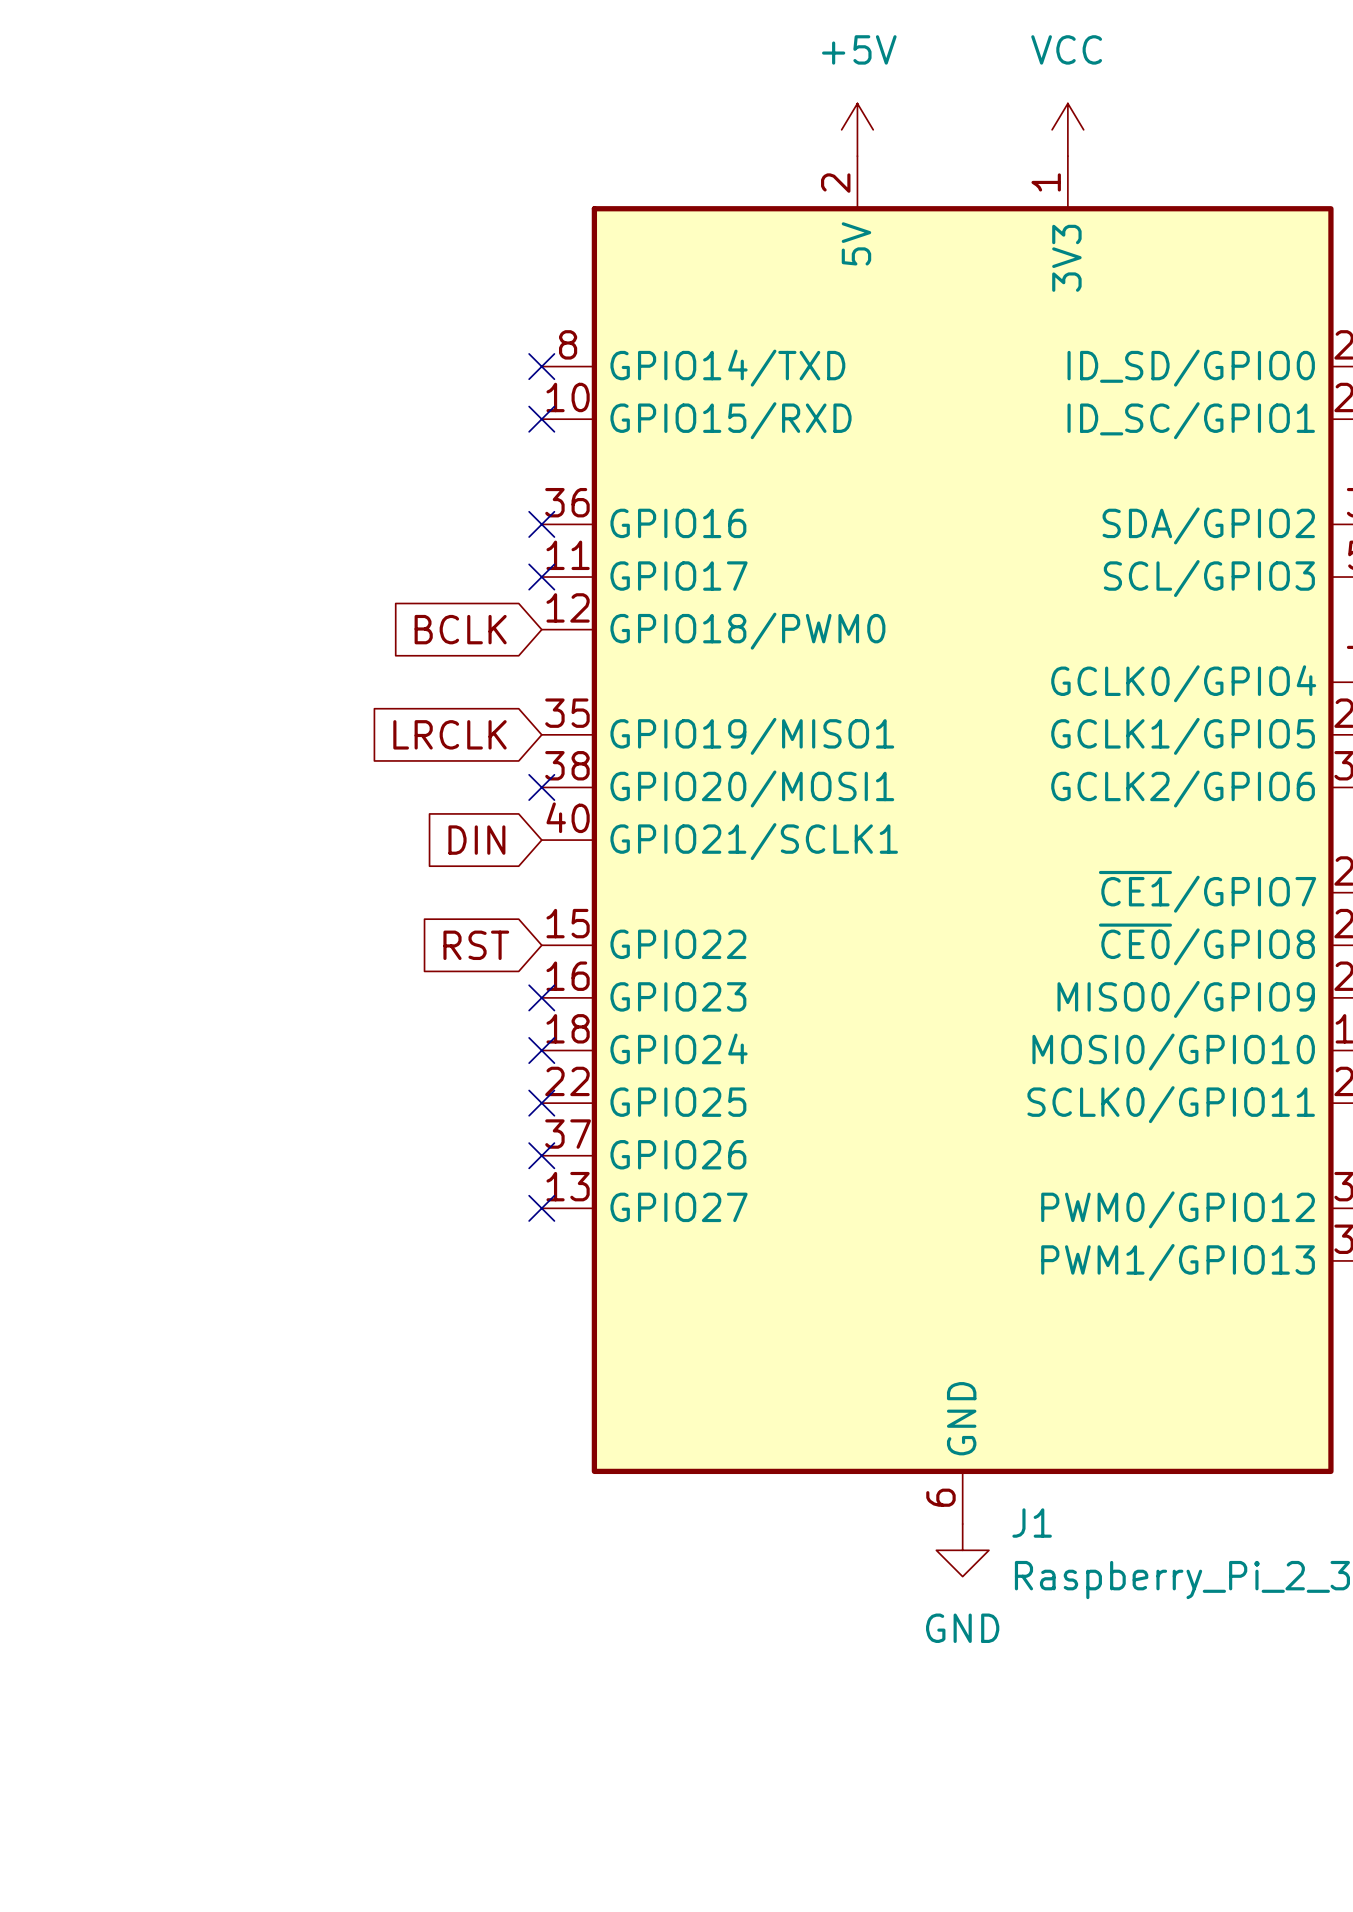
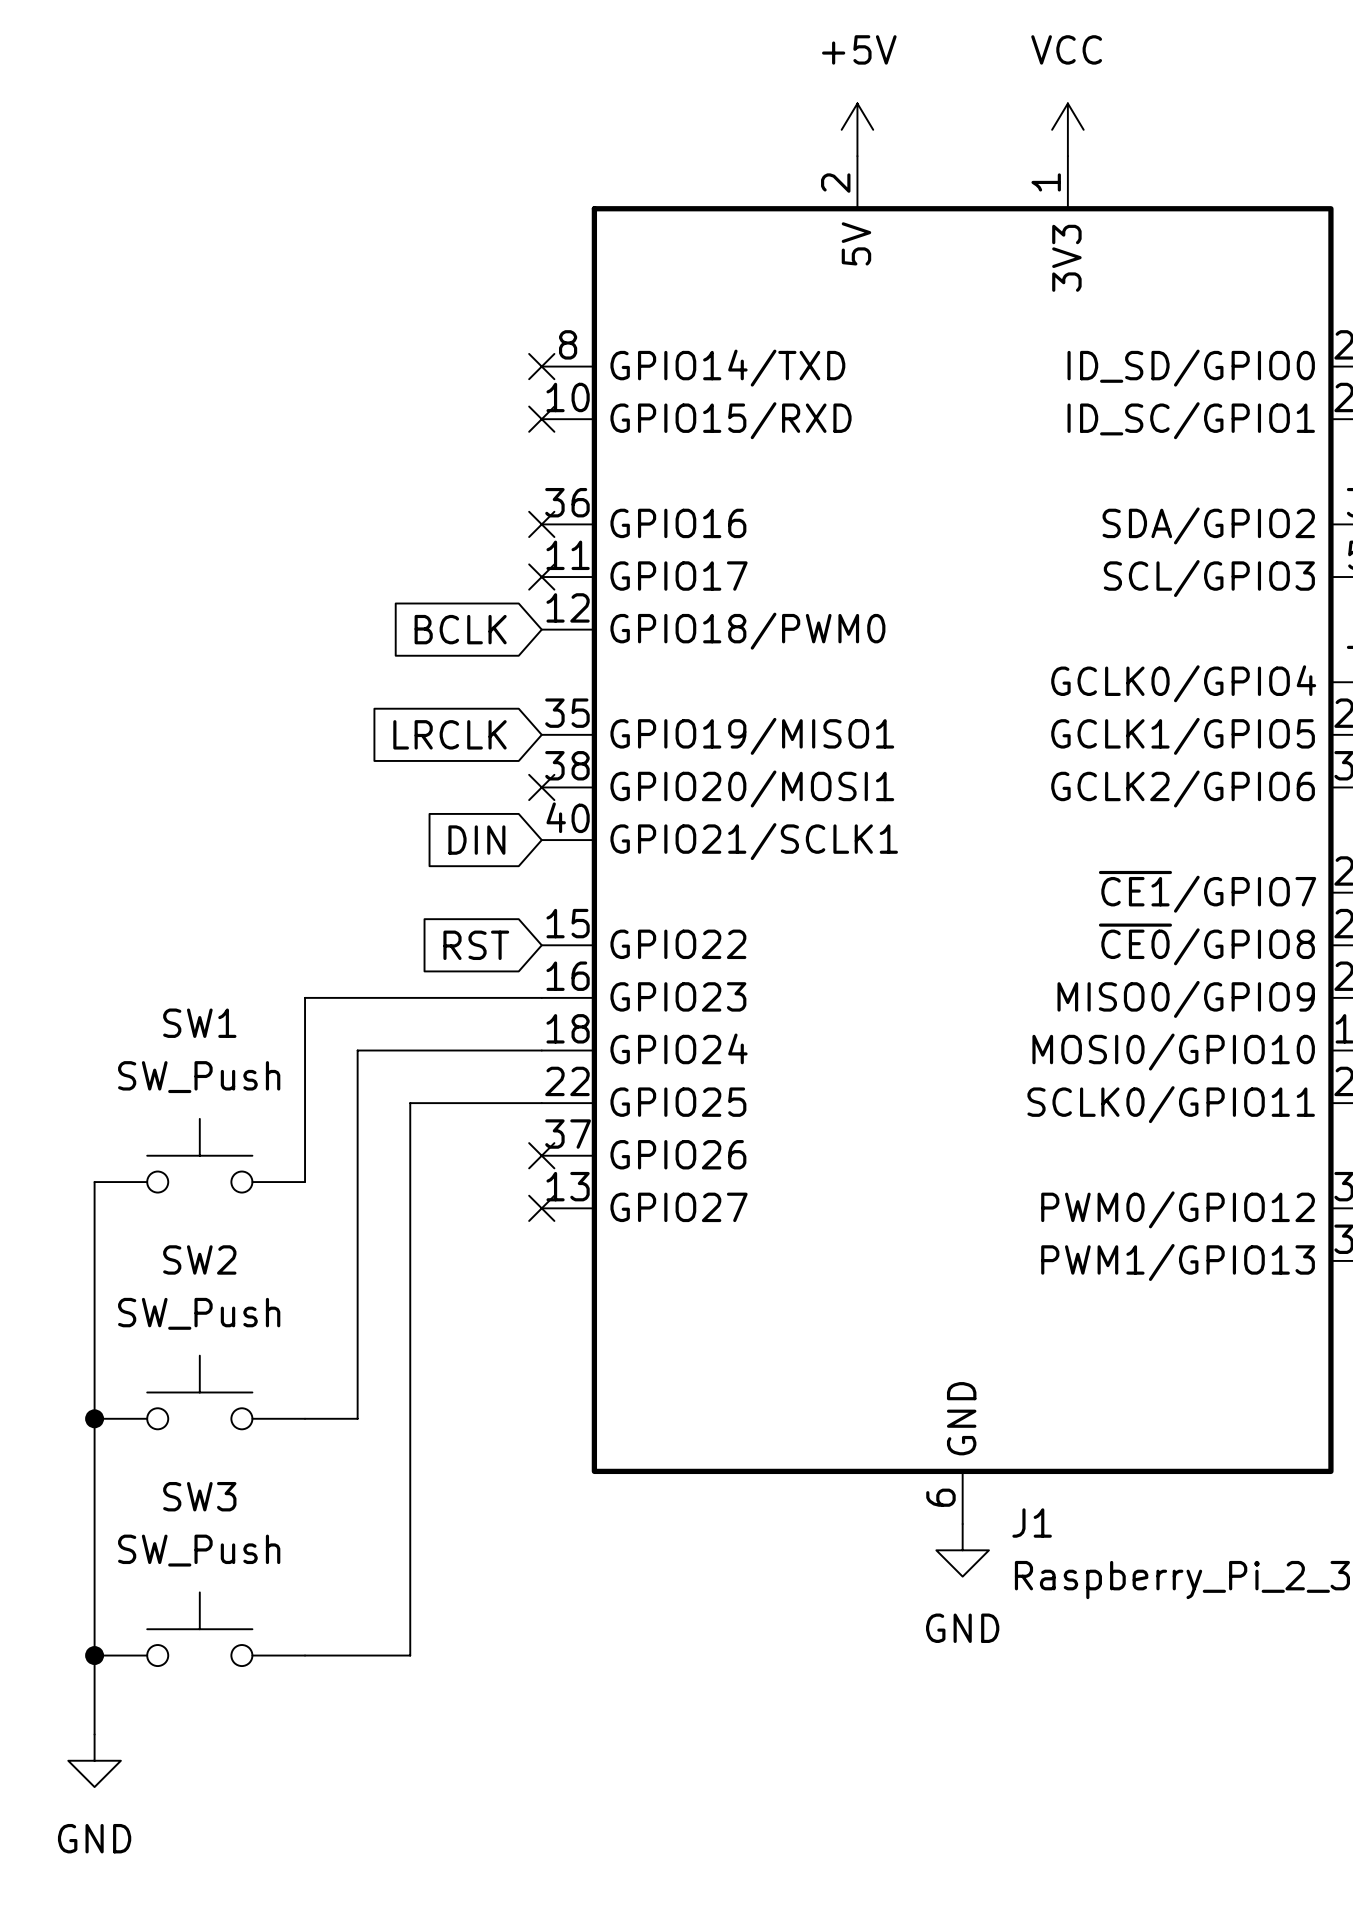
wire: none -> (541, 997) (305, 997) (305, 1182)
no-connect mark: (541, 997) -> none
wire: none -> (541, 1050) (357, 1050) (357, 1418) (305, 1418)
no-connect mark: (541, 1050) -> none
wire: none -> (541, 1103) (410, 1103) (410, 1655) (305, 1655)
no-connect mark: (541, 1103) -> none
SW1: none -> SW_Push (199, 1155)
wire: none -> (94, 1182) (94, 1734)
SW2: none -> SW_Push (199, 1392)
junction: none -> (94, 1418)
SW3: none -> SW_Push (199, 1629)
junction: none -> (94, 1655)
power symbol: none -> GND (94, 1760)

